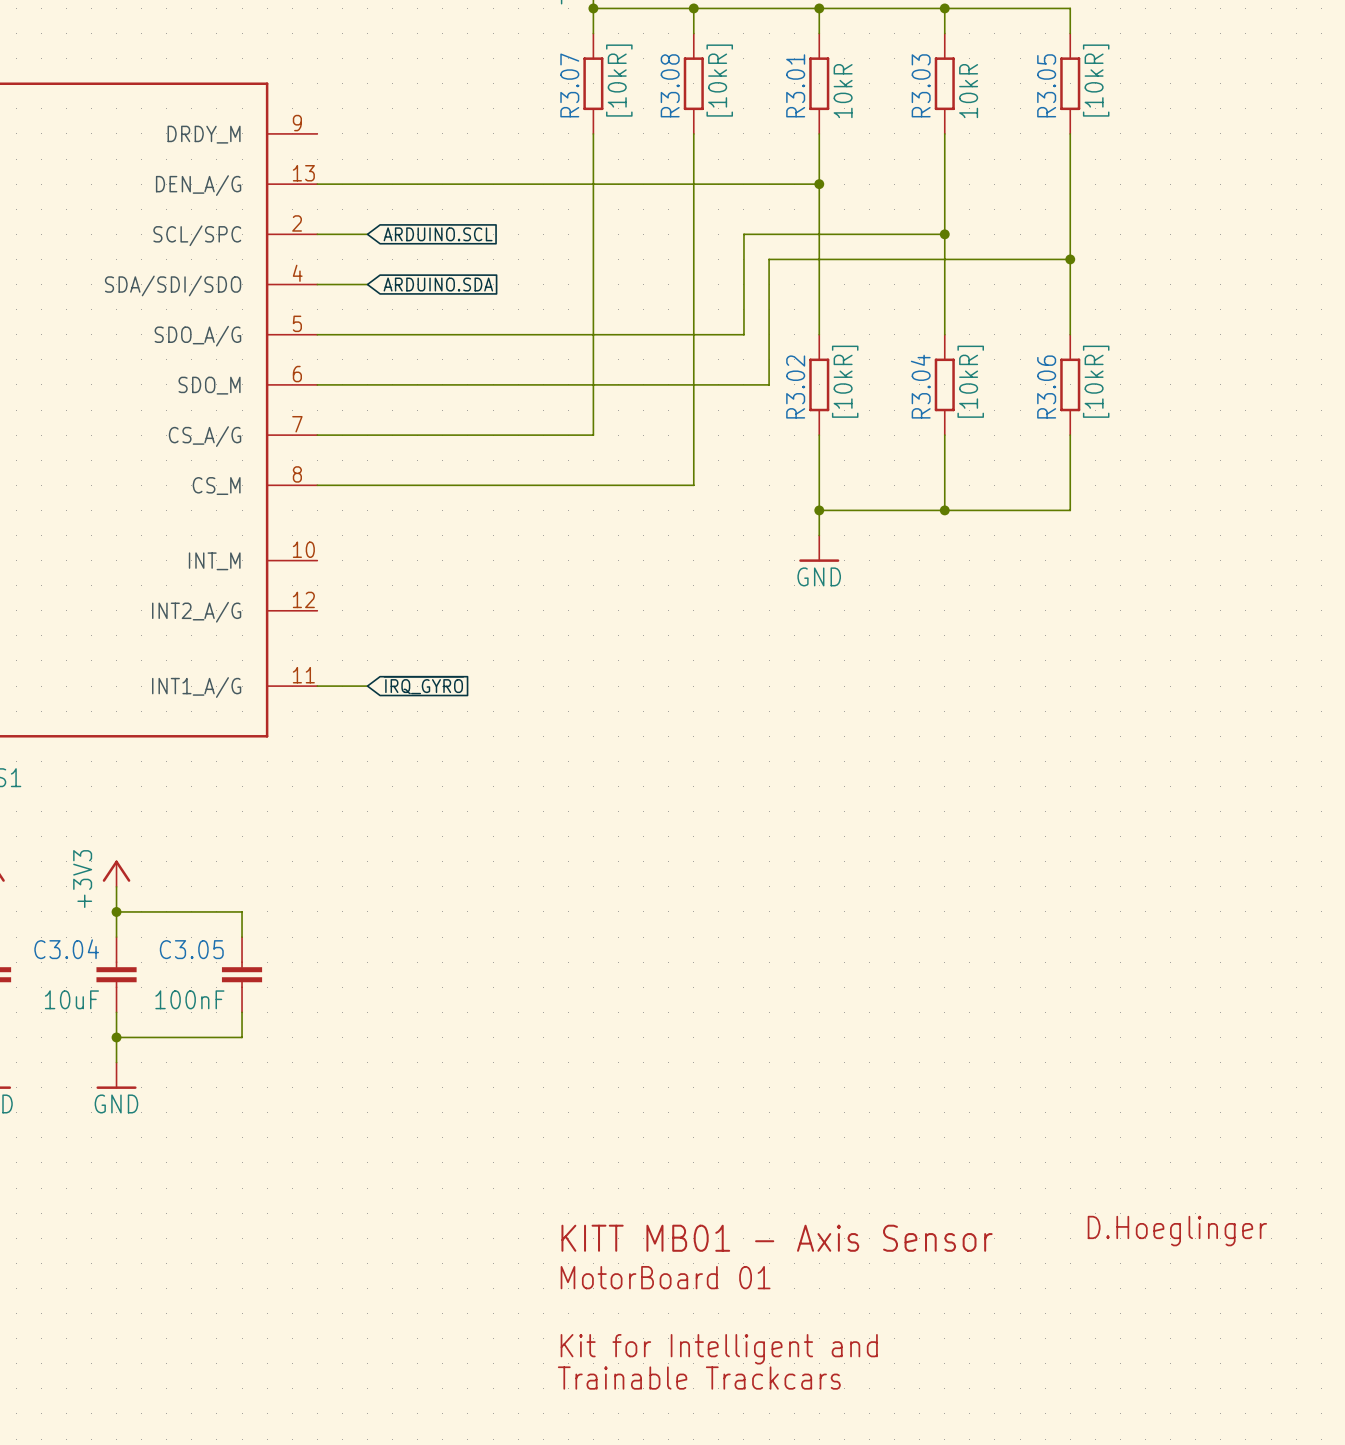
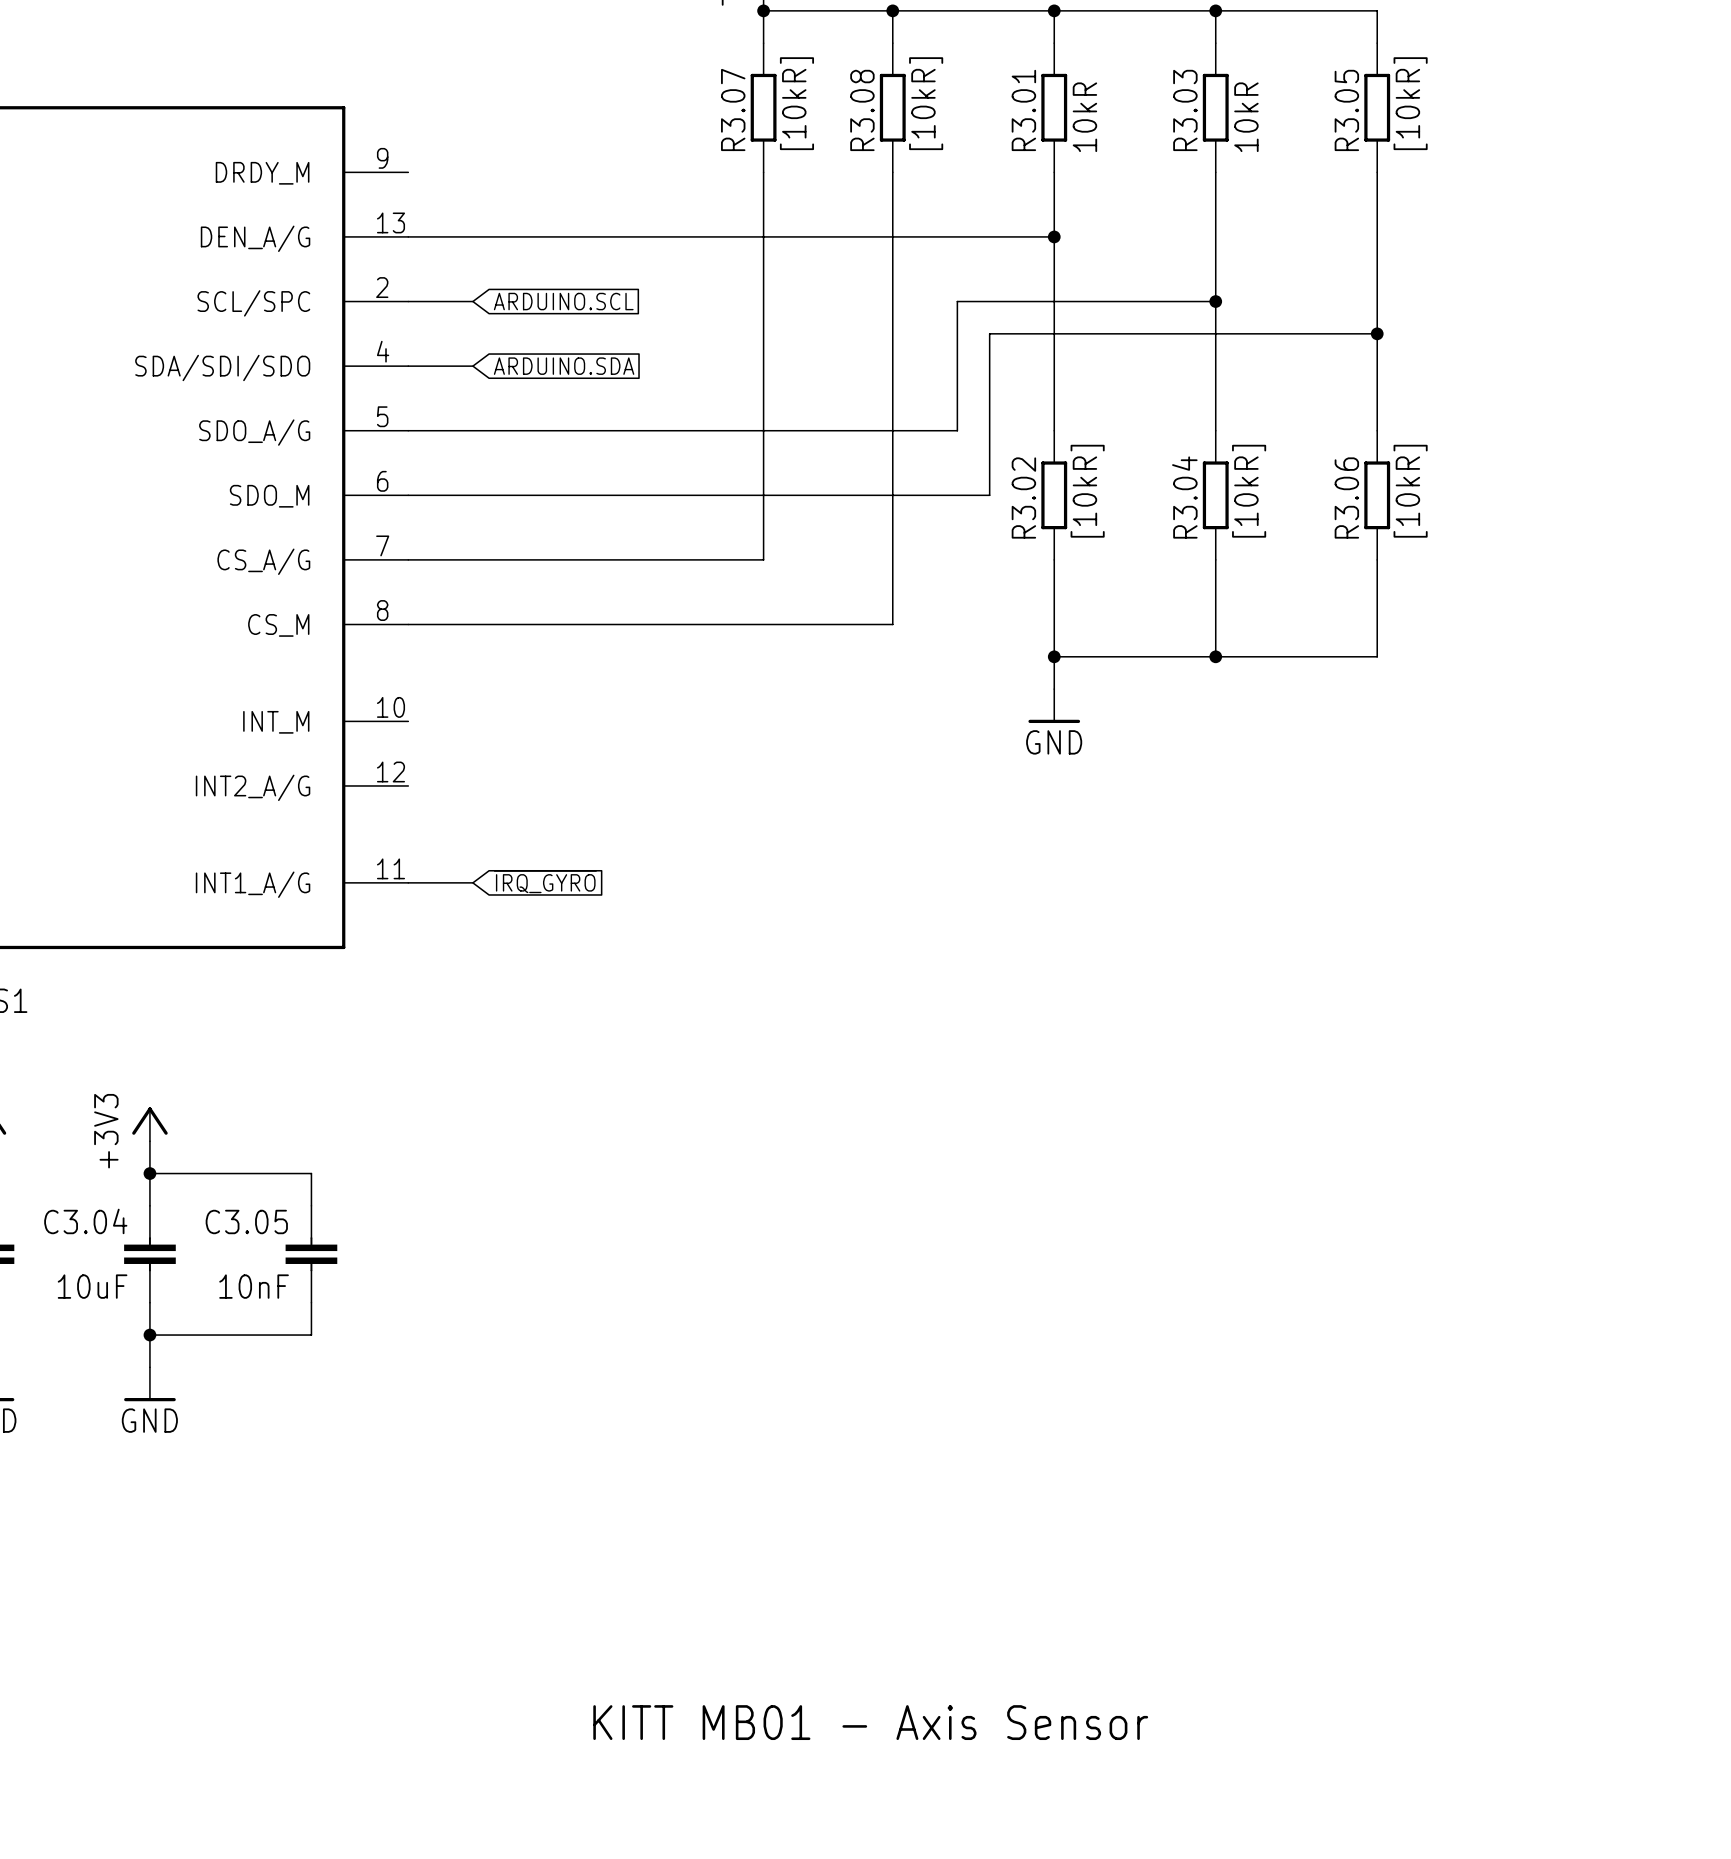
C3.05 value: 100nF (189, 999) -> 10nF (254, 1286)
text: D.Hoeglinger (1177, 1231) -> none
text position: KITT MB01 - Axis Sensor (777, 1238) -> KITT MB01 - Axis Sensor (870, 1722)
text: MotorBoard 01 (665, 1277) -> none
text: Kit for Intelligent and (719, 1349) -> none
text: Trainable Trackcars (699, 1378) -> none

